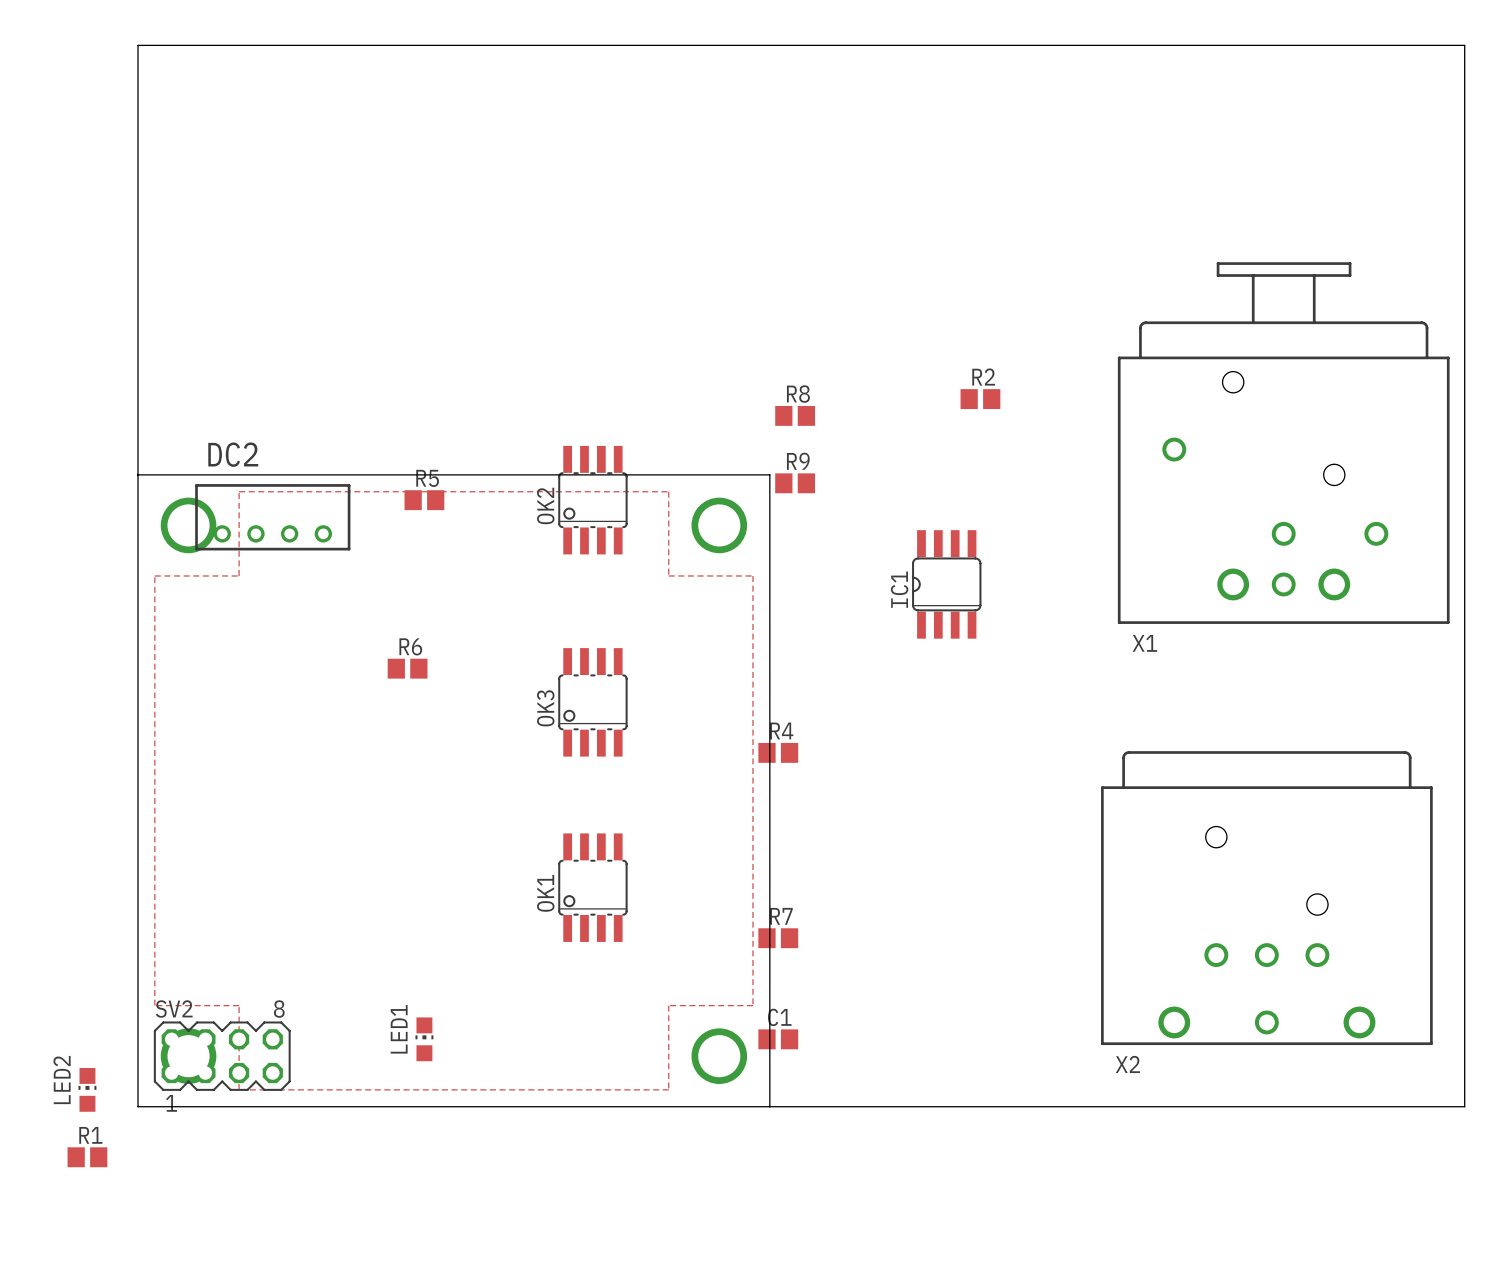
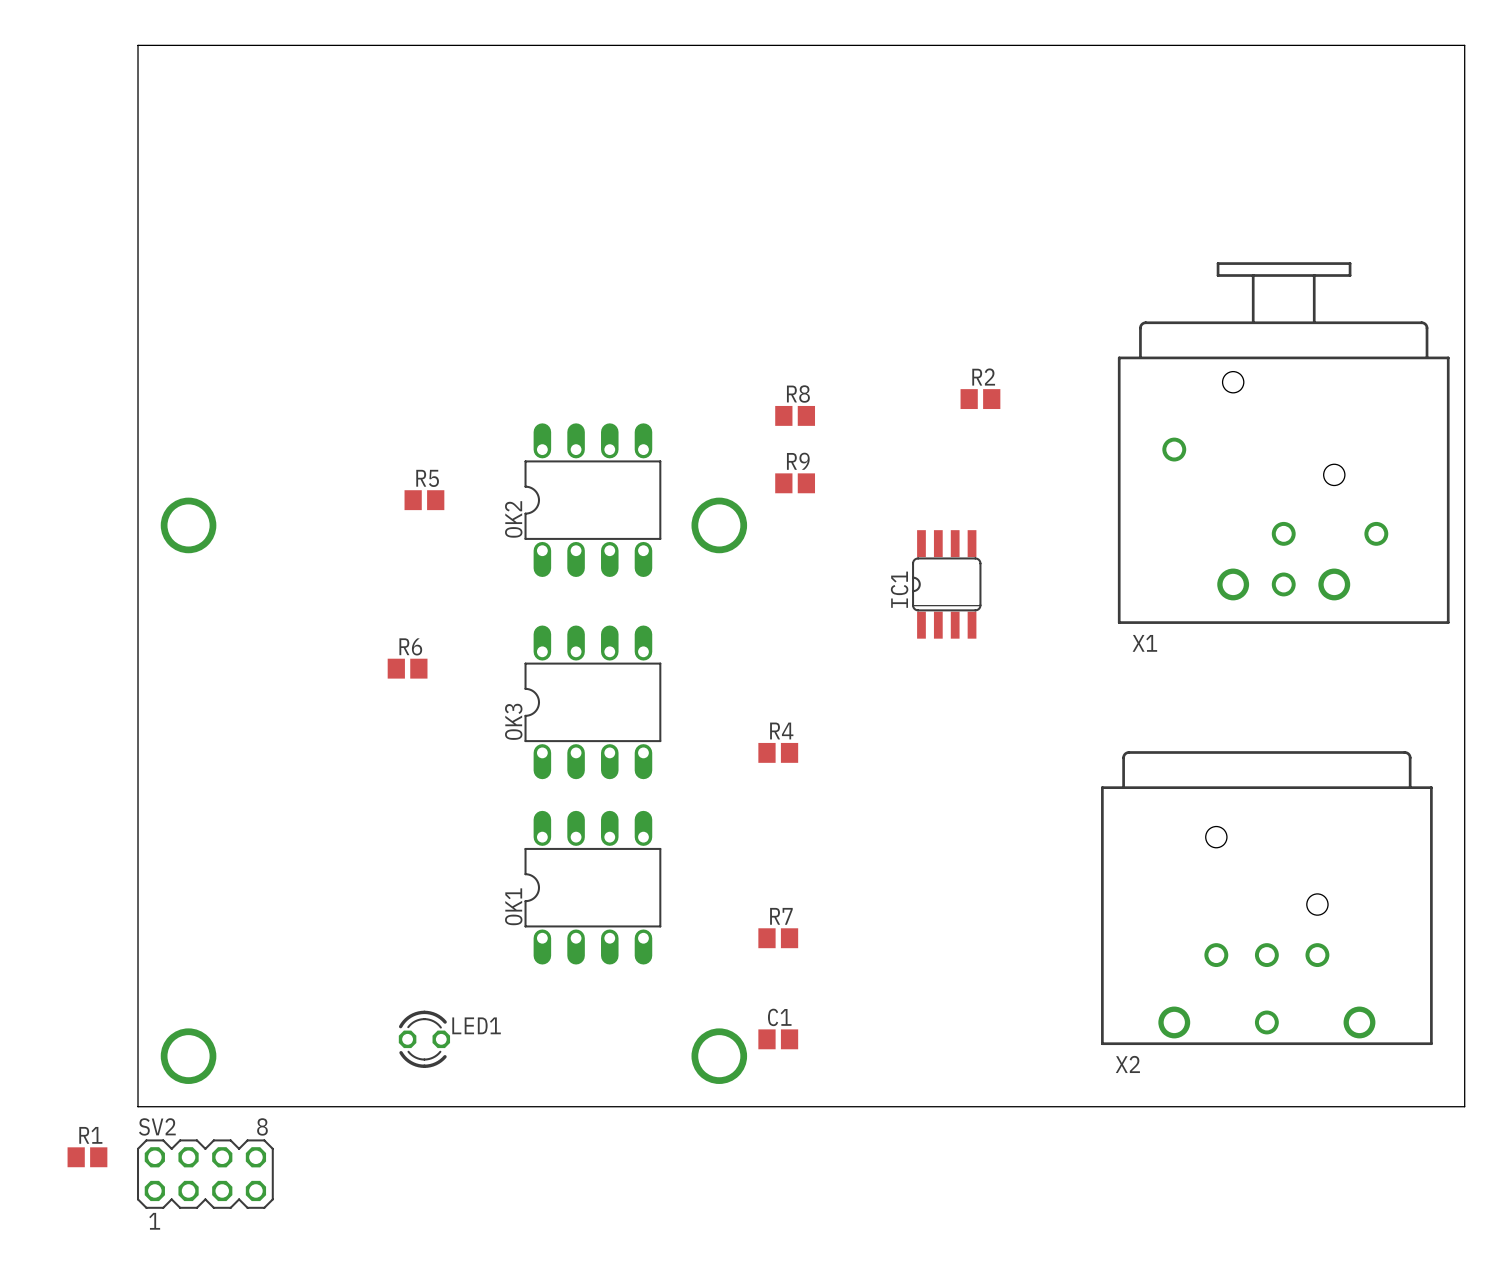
OK2 footprint: [558, 445, 628, 555] -> [524, 423, 662, 577]
board edge: (138, 474) (769, 474) (769, 1106) -> none
zone outline: (239, 491) (239, 575) (154, 575) (154, 1005) (239, 1005) (239, 1089) (668, 1089) (668, 1005) (752, 1005) (752, 575) (668, 575) (668, 491) (239, 491) -> none
OK2 name position: OK2 (545, 505) -> OK2 (513, 519)
DC2: (272, 517) -> none
OK3 footprint: [558, 648, 628, 757] -> [524, 625, 662, 780]
OK3 name position: OK3 (545, 708) -> OK3 (513, 721)
OK1 footprint: [558, 833, 628, 942] -> [524, 810, 662, 965]
OK1 name position: OK1 (545, 893) -> OK1 (513, 906)
LED1 footprint: [415, 1017, 434, 1062] -> [398, 1010, 451, 1068]
LED1 name position: LED1 (399, 1029) -> LED1 (476, 1025)
SV2 position: (222, 1056) -> (205, 1174)
LED2: (87, 1089) -> none

